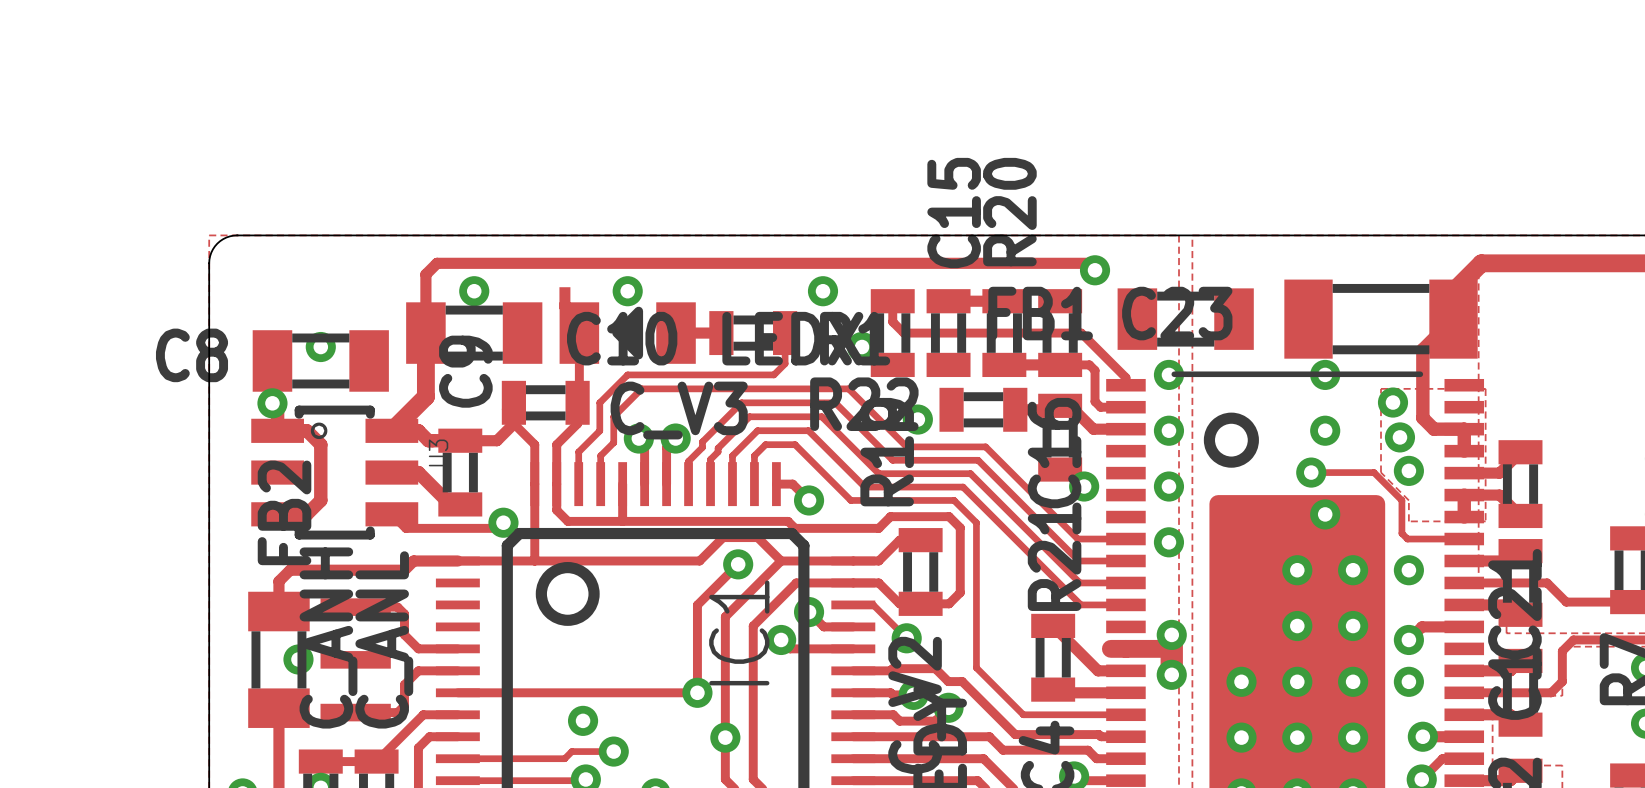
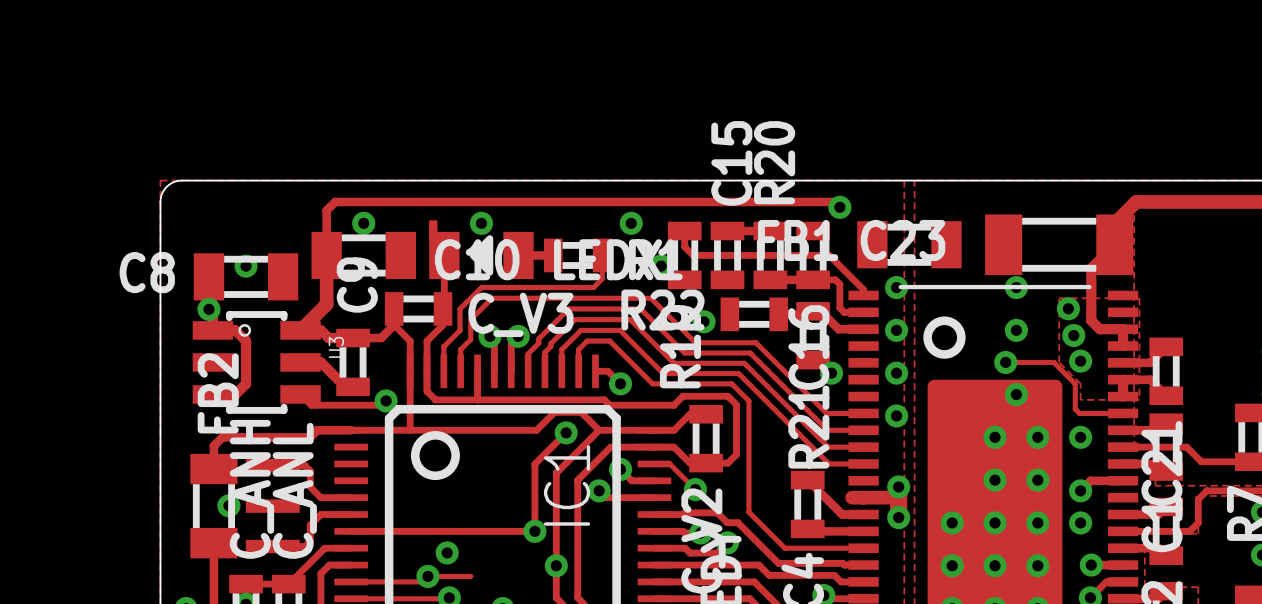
via: none -> (427, 576)
via: (613, 751) -> none

